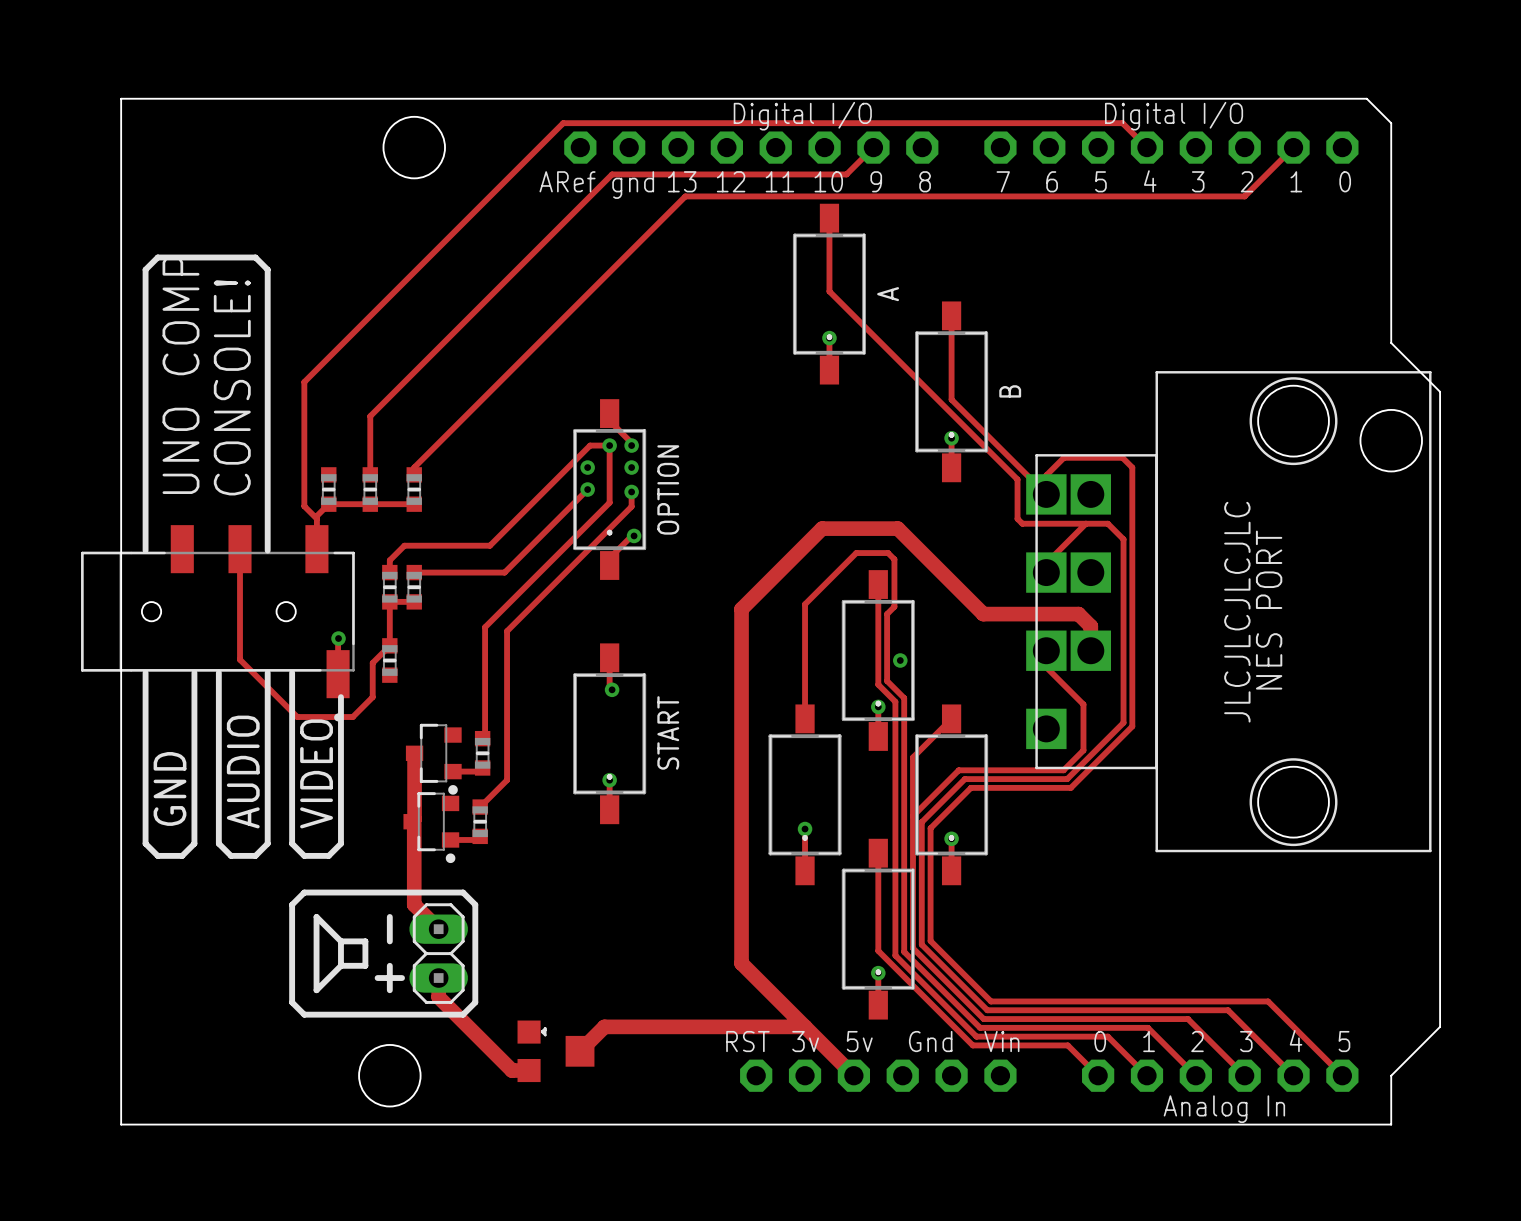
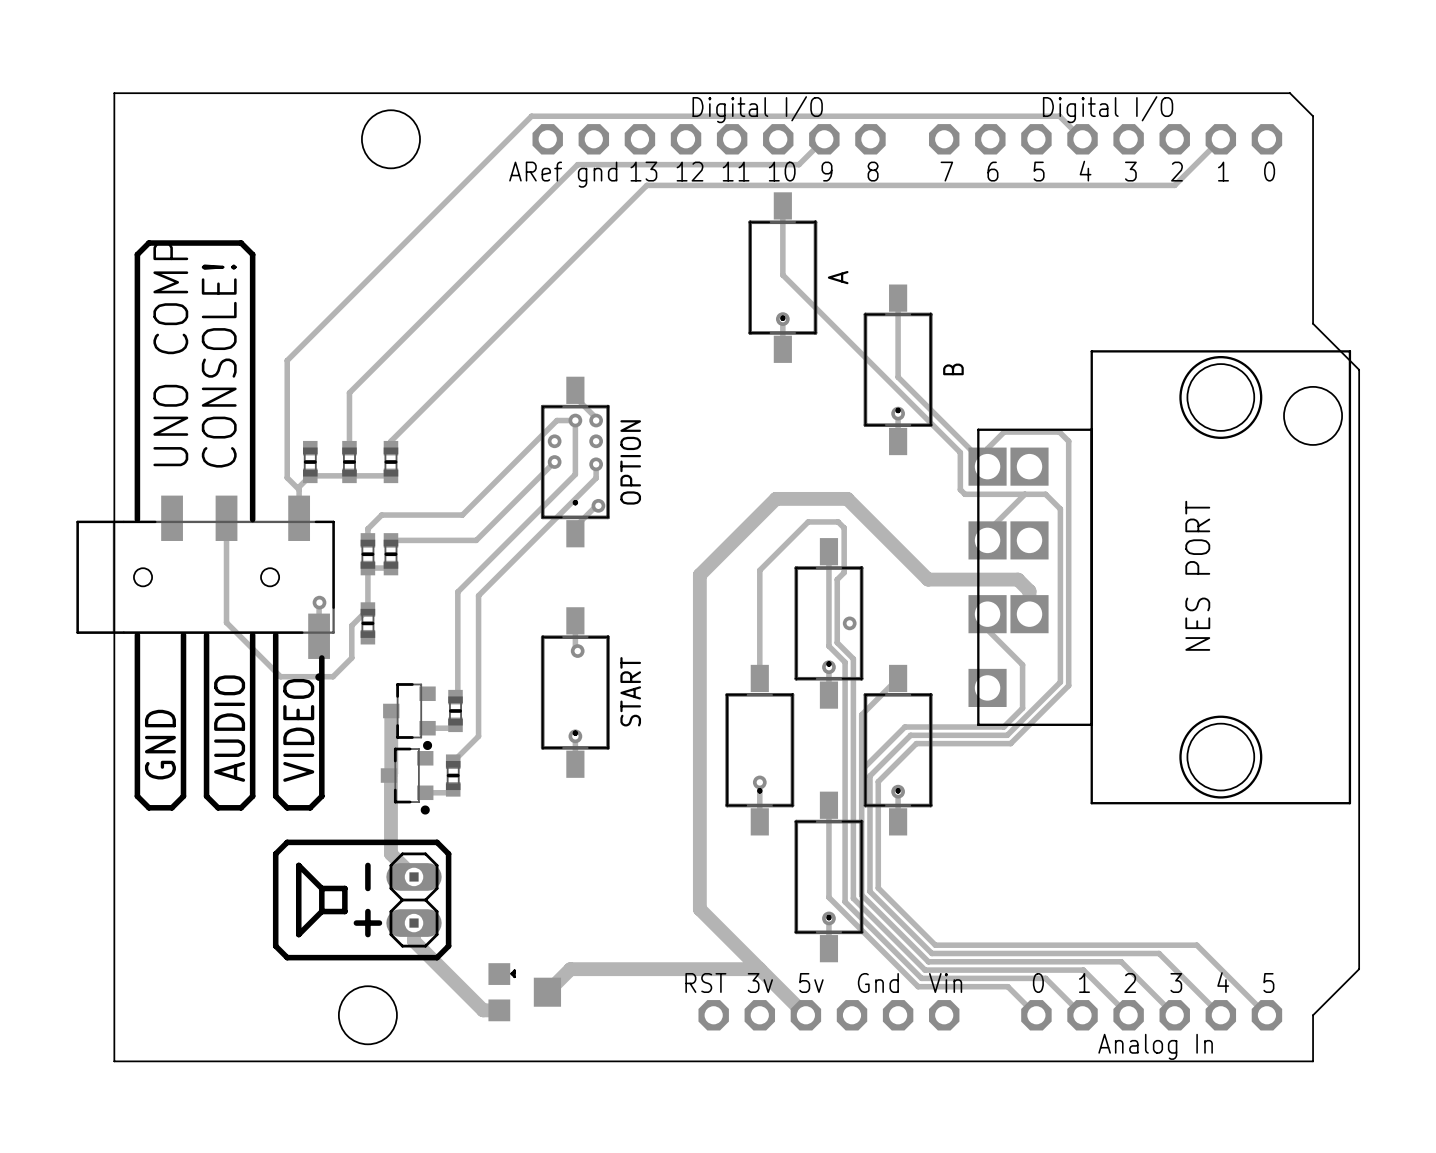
text: JLCJLCJLCJLC (1237, 612) -> none

